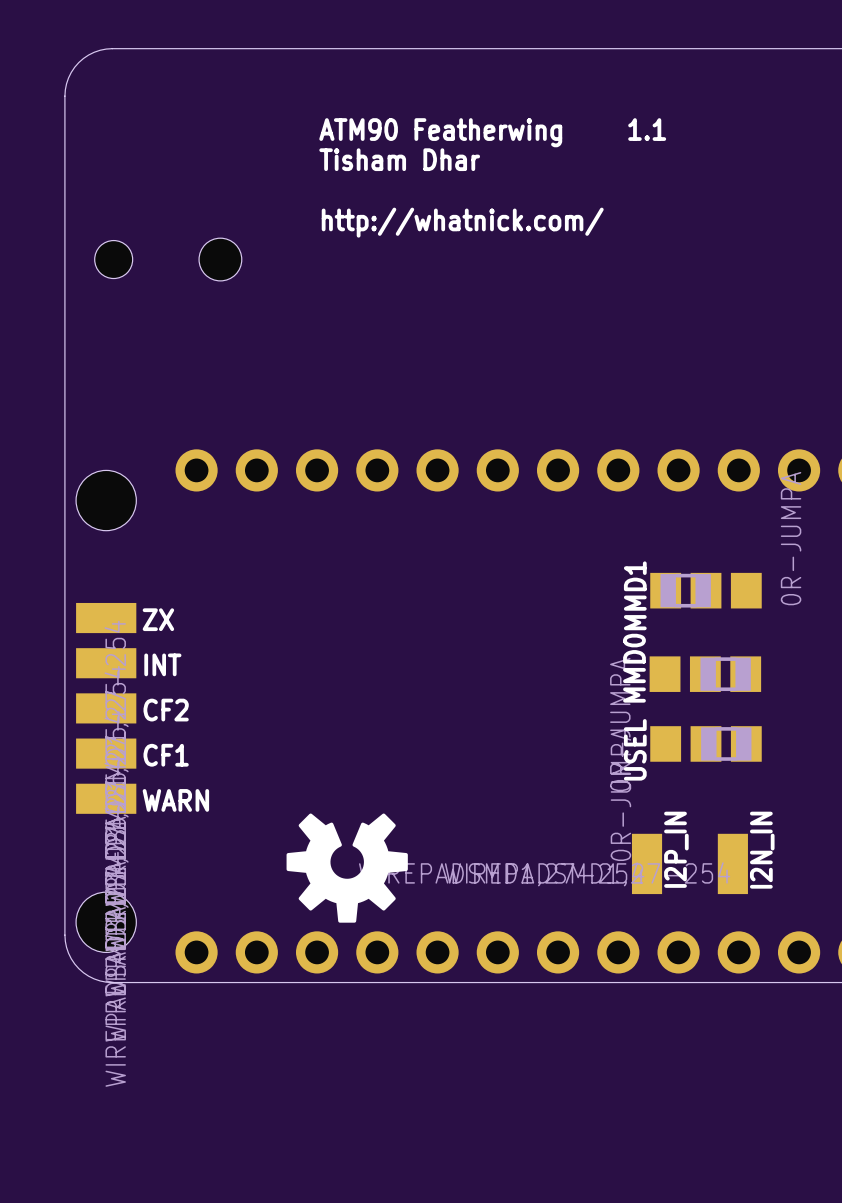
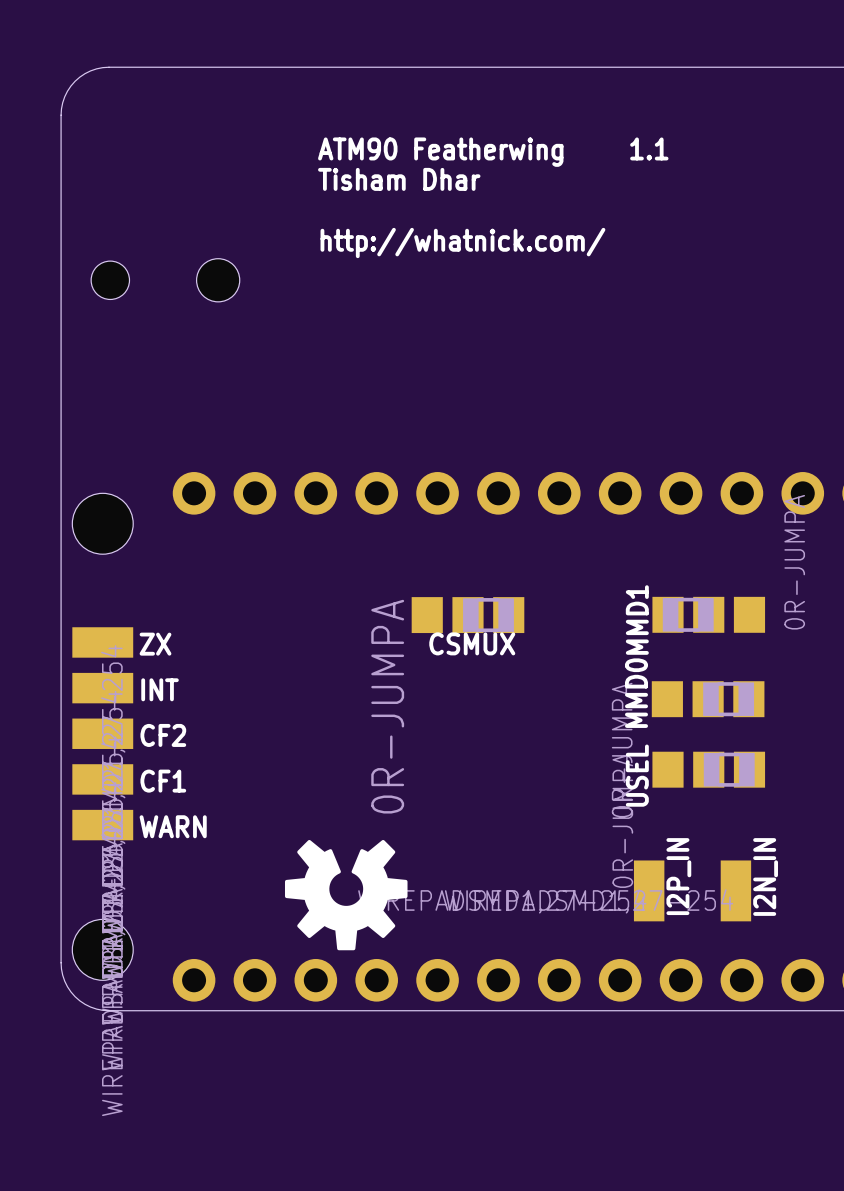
CSMUX: none -> 0R-JUMPA (467, 615)

